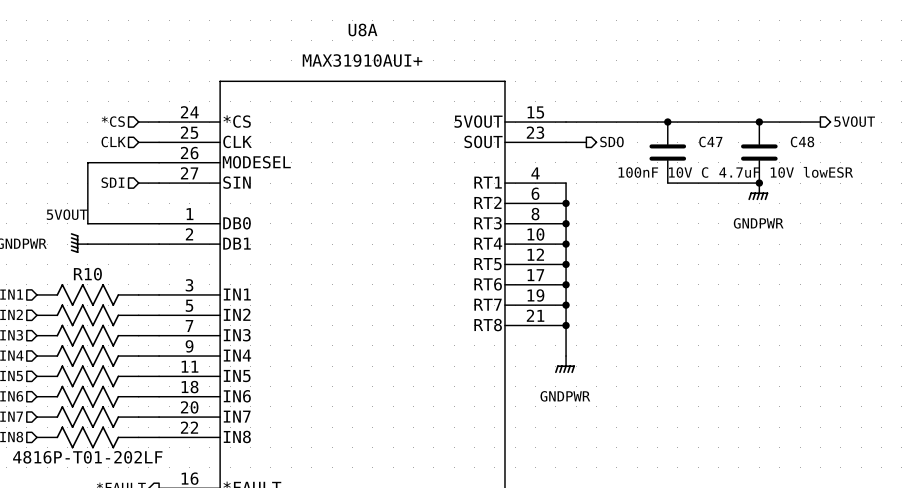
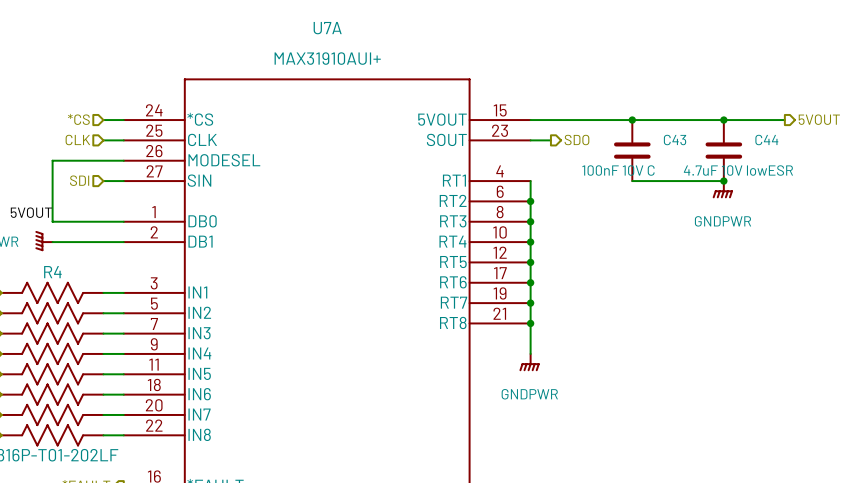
U8A name: U8A (363, 29) -> U7A (327, 28)
C47 name: C47 (710, 141) -> C43 (675, 140)
C48 name: C48 (802, 141) -> C44 (766, 140)
R10 name: R10 (87, 274) -> R4 (52, 272)

